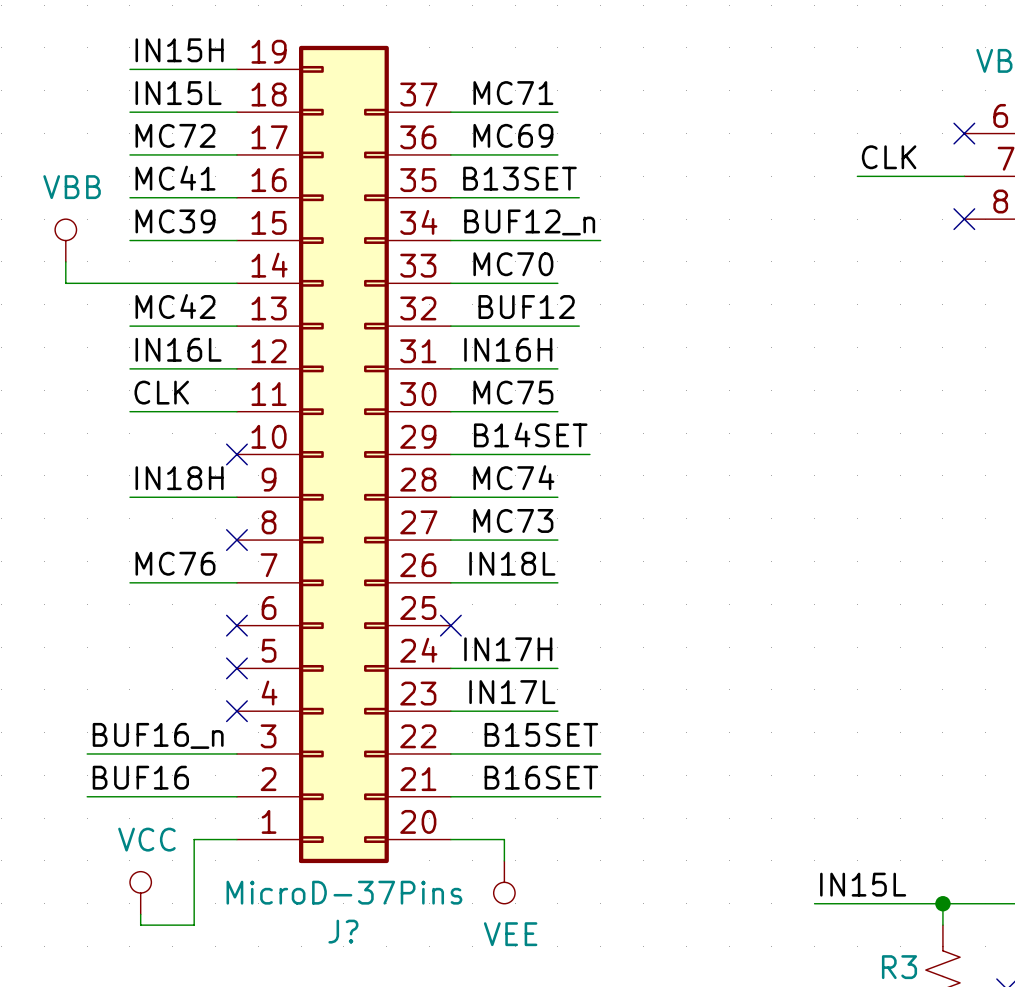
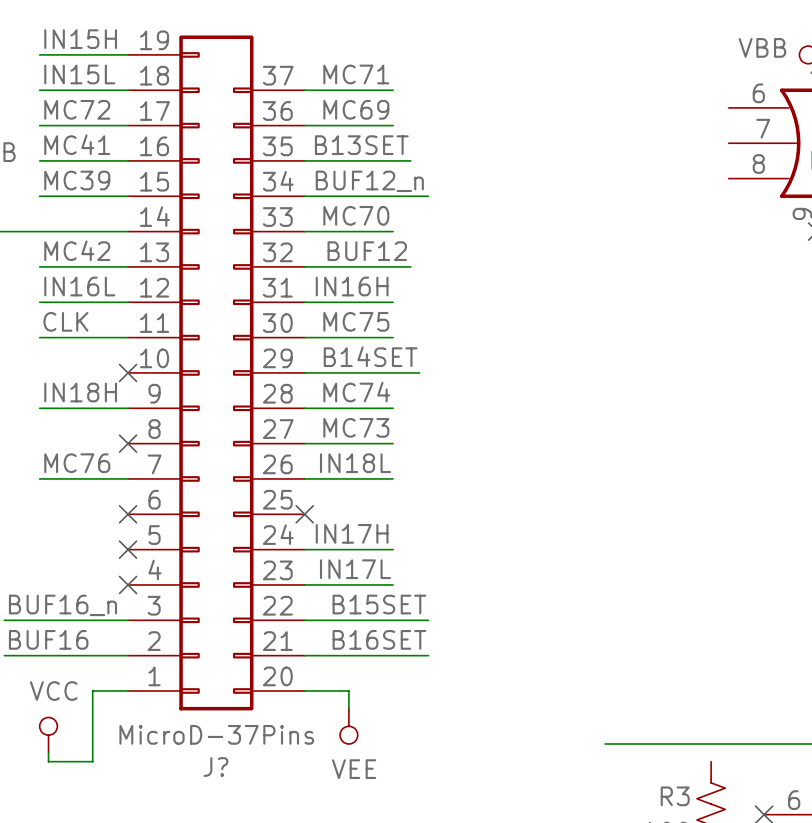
no-connect mark: (964, 133) -> none
label: CLK (889, 157) -> none
wire: (857, 176) (964, 176) -> none
no-connect mark: (964, 219) -> none
label: IN15L (863, 884) -> none
wire: (942, 903) (942, 925) -> none
junction: (942, 903) -> none

